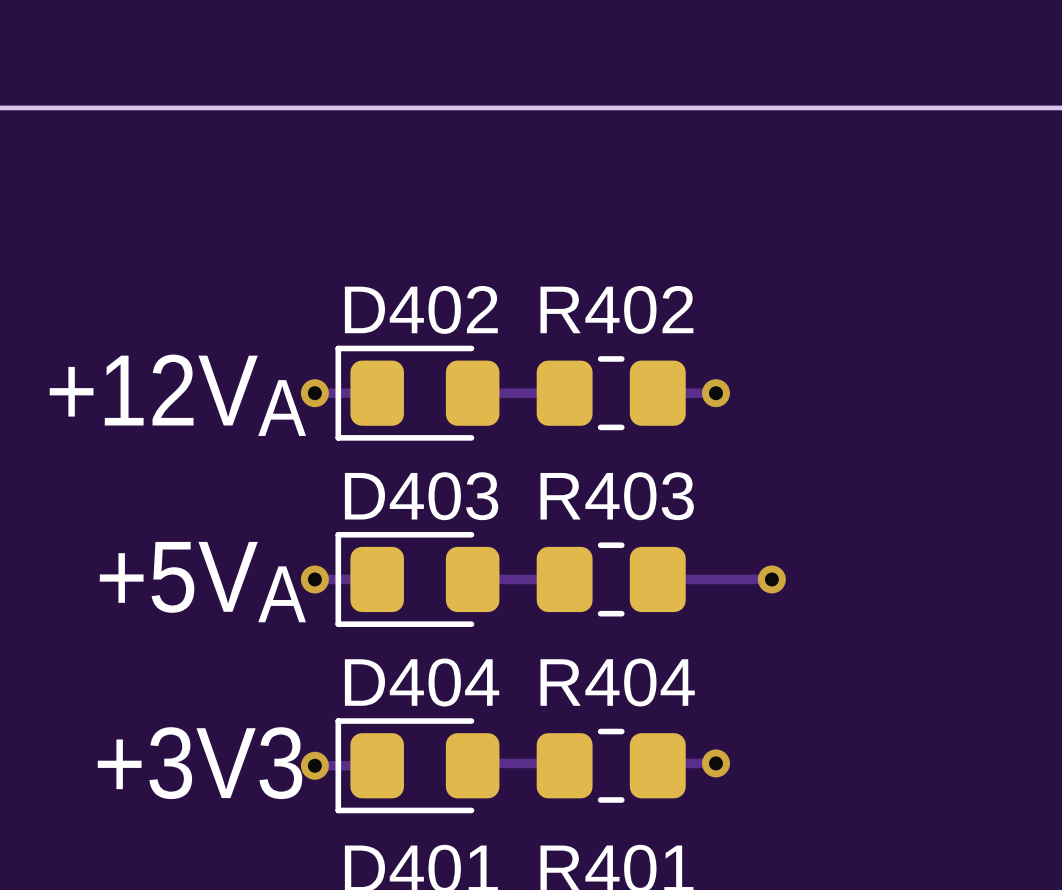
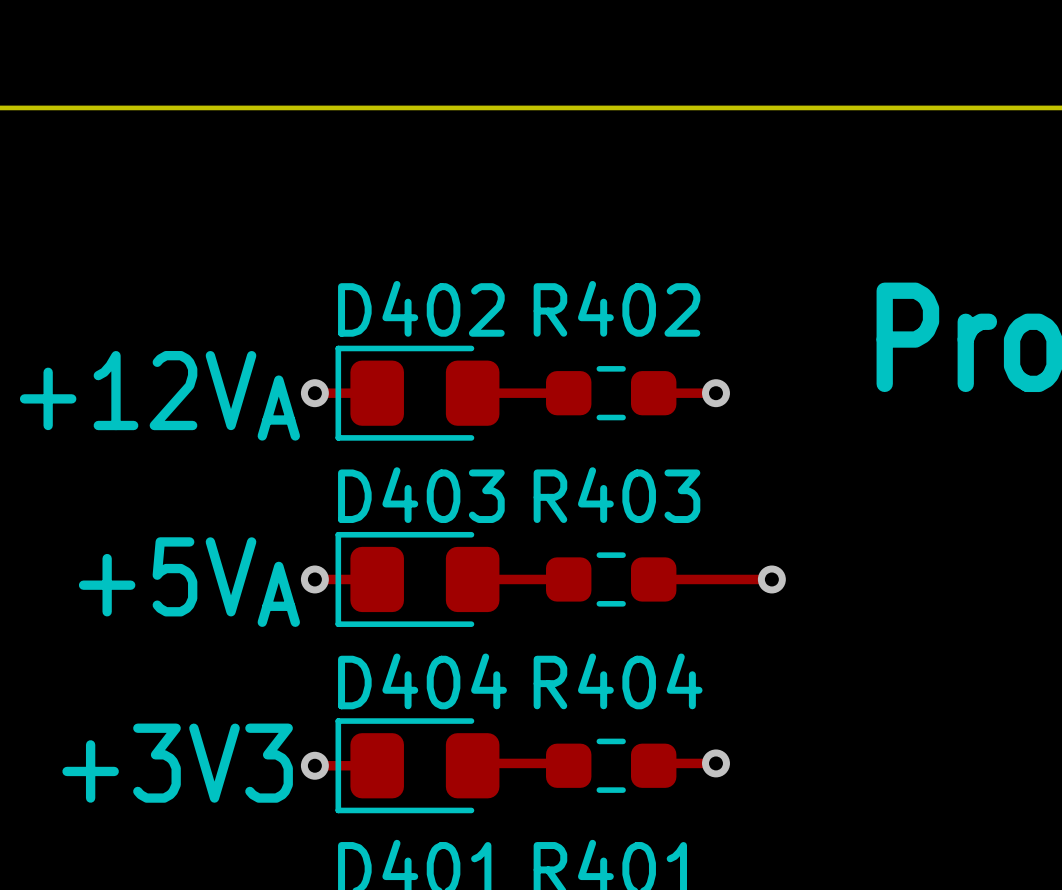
R402 footprint: [536, 356, 686, 431] -> [546, 366, 677, 421]
R403 footprint: [536, 542, 686, 617] -> [546, 552, 677, 607]
R404 footprint: [536, 728, 686, 803] -> [546, 738, 677, 793]

